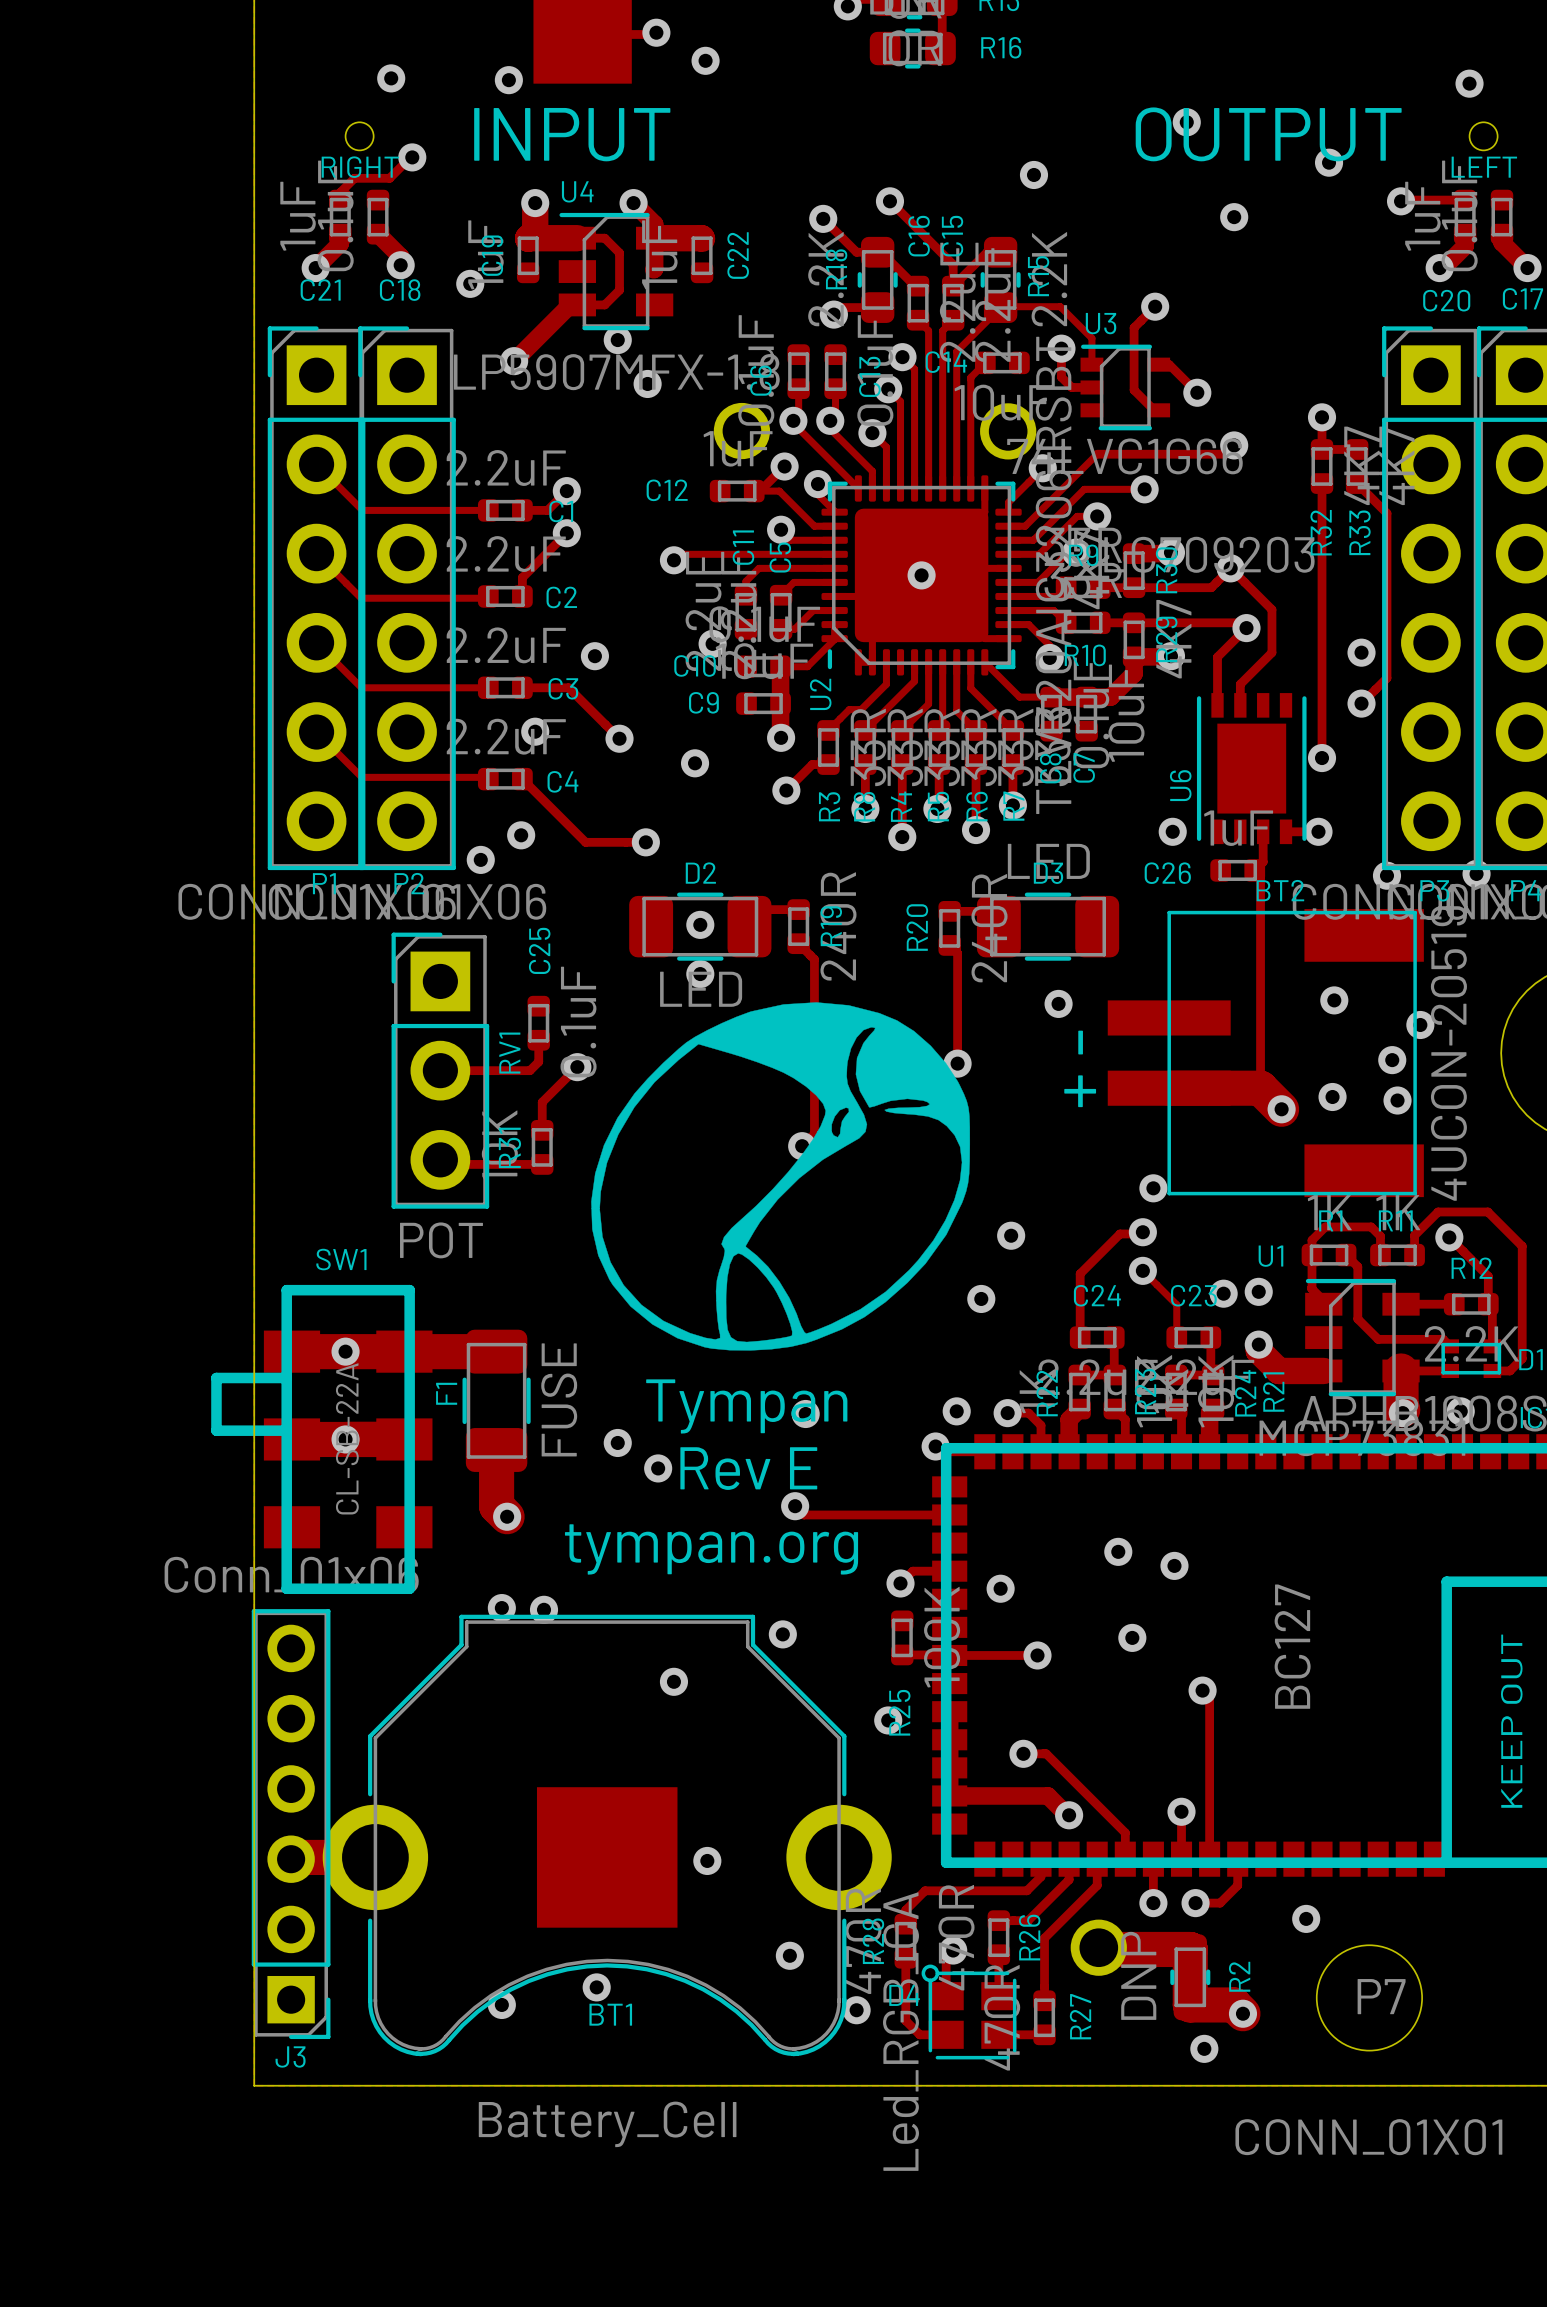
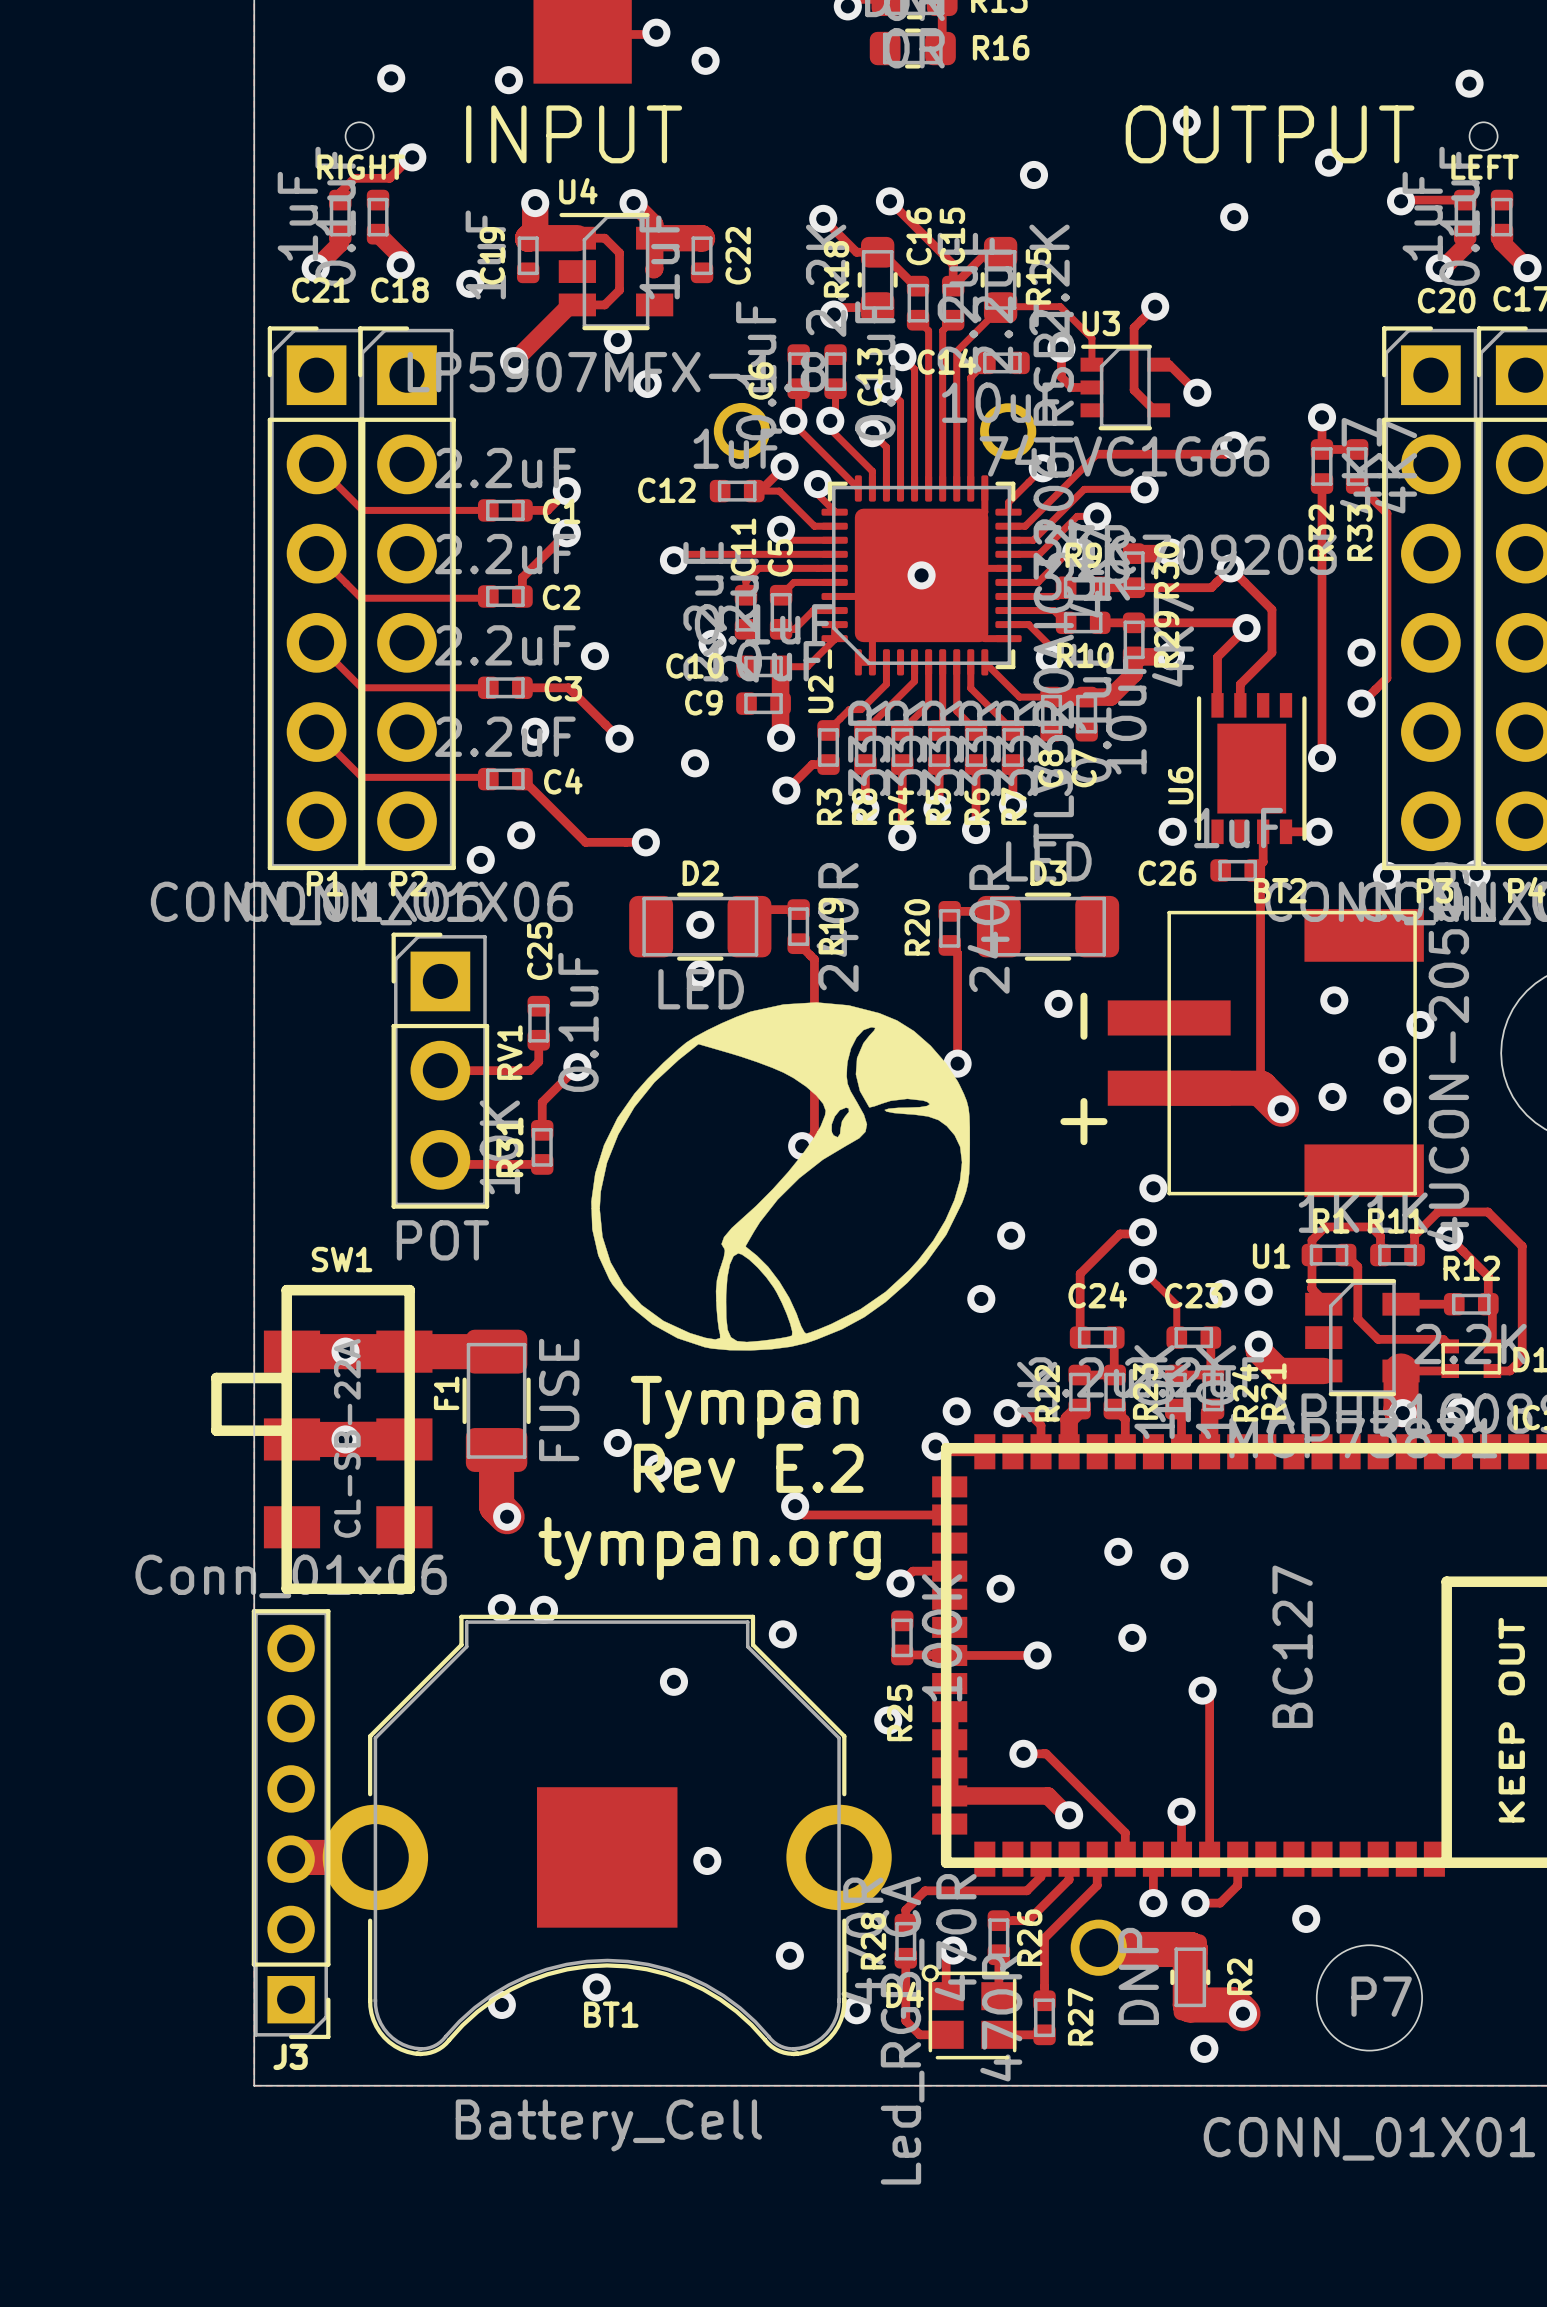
text: Rev E (748, 1468) -> Rev E.2 (748, 1468)

